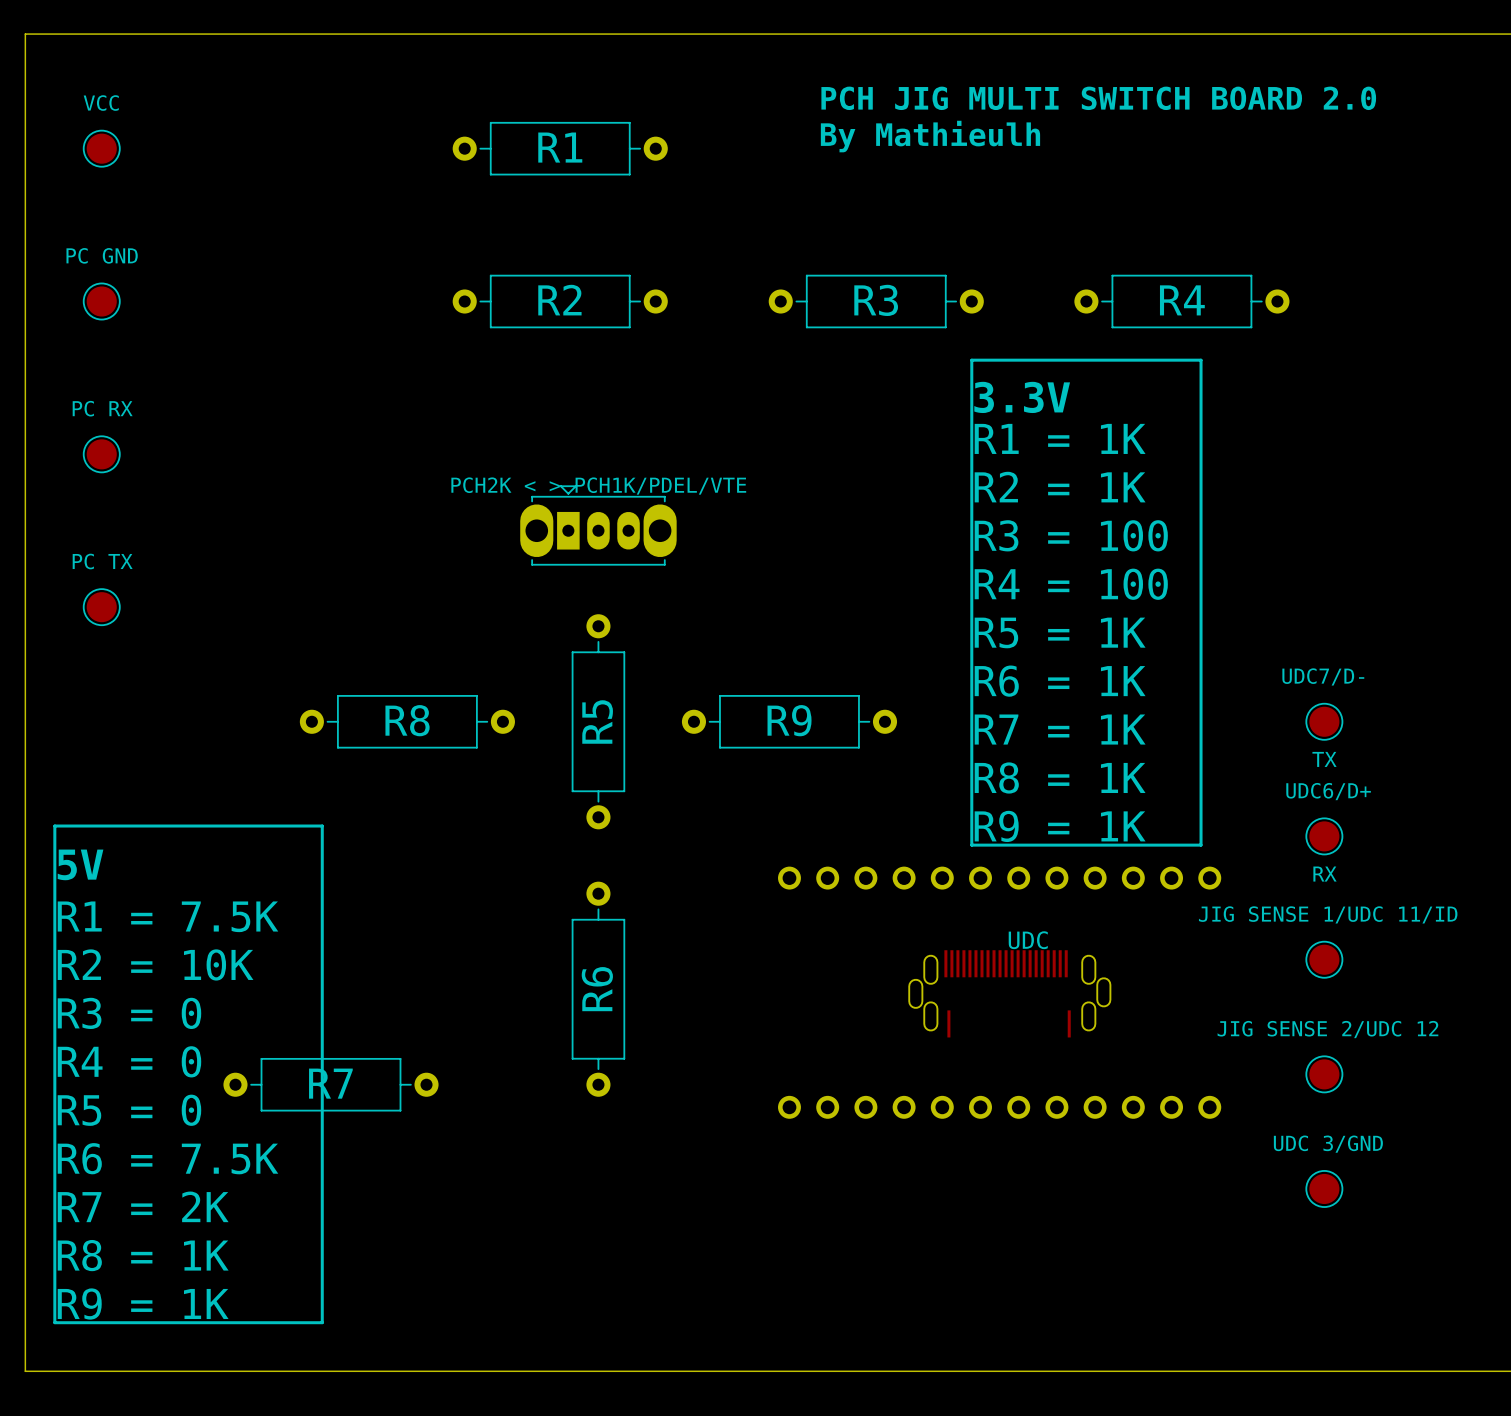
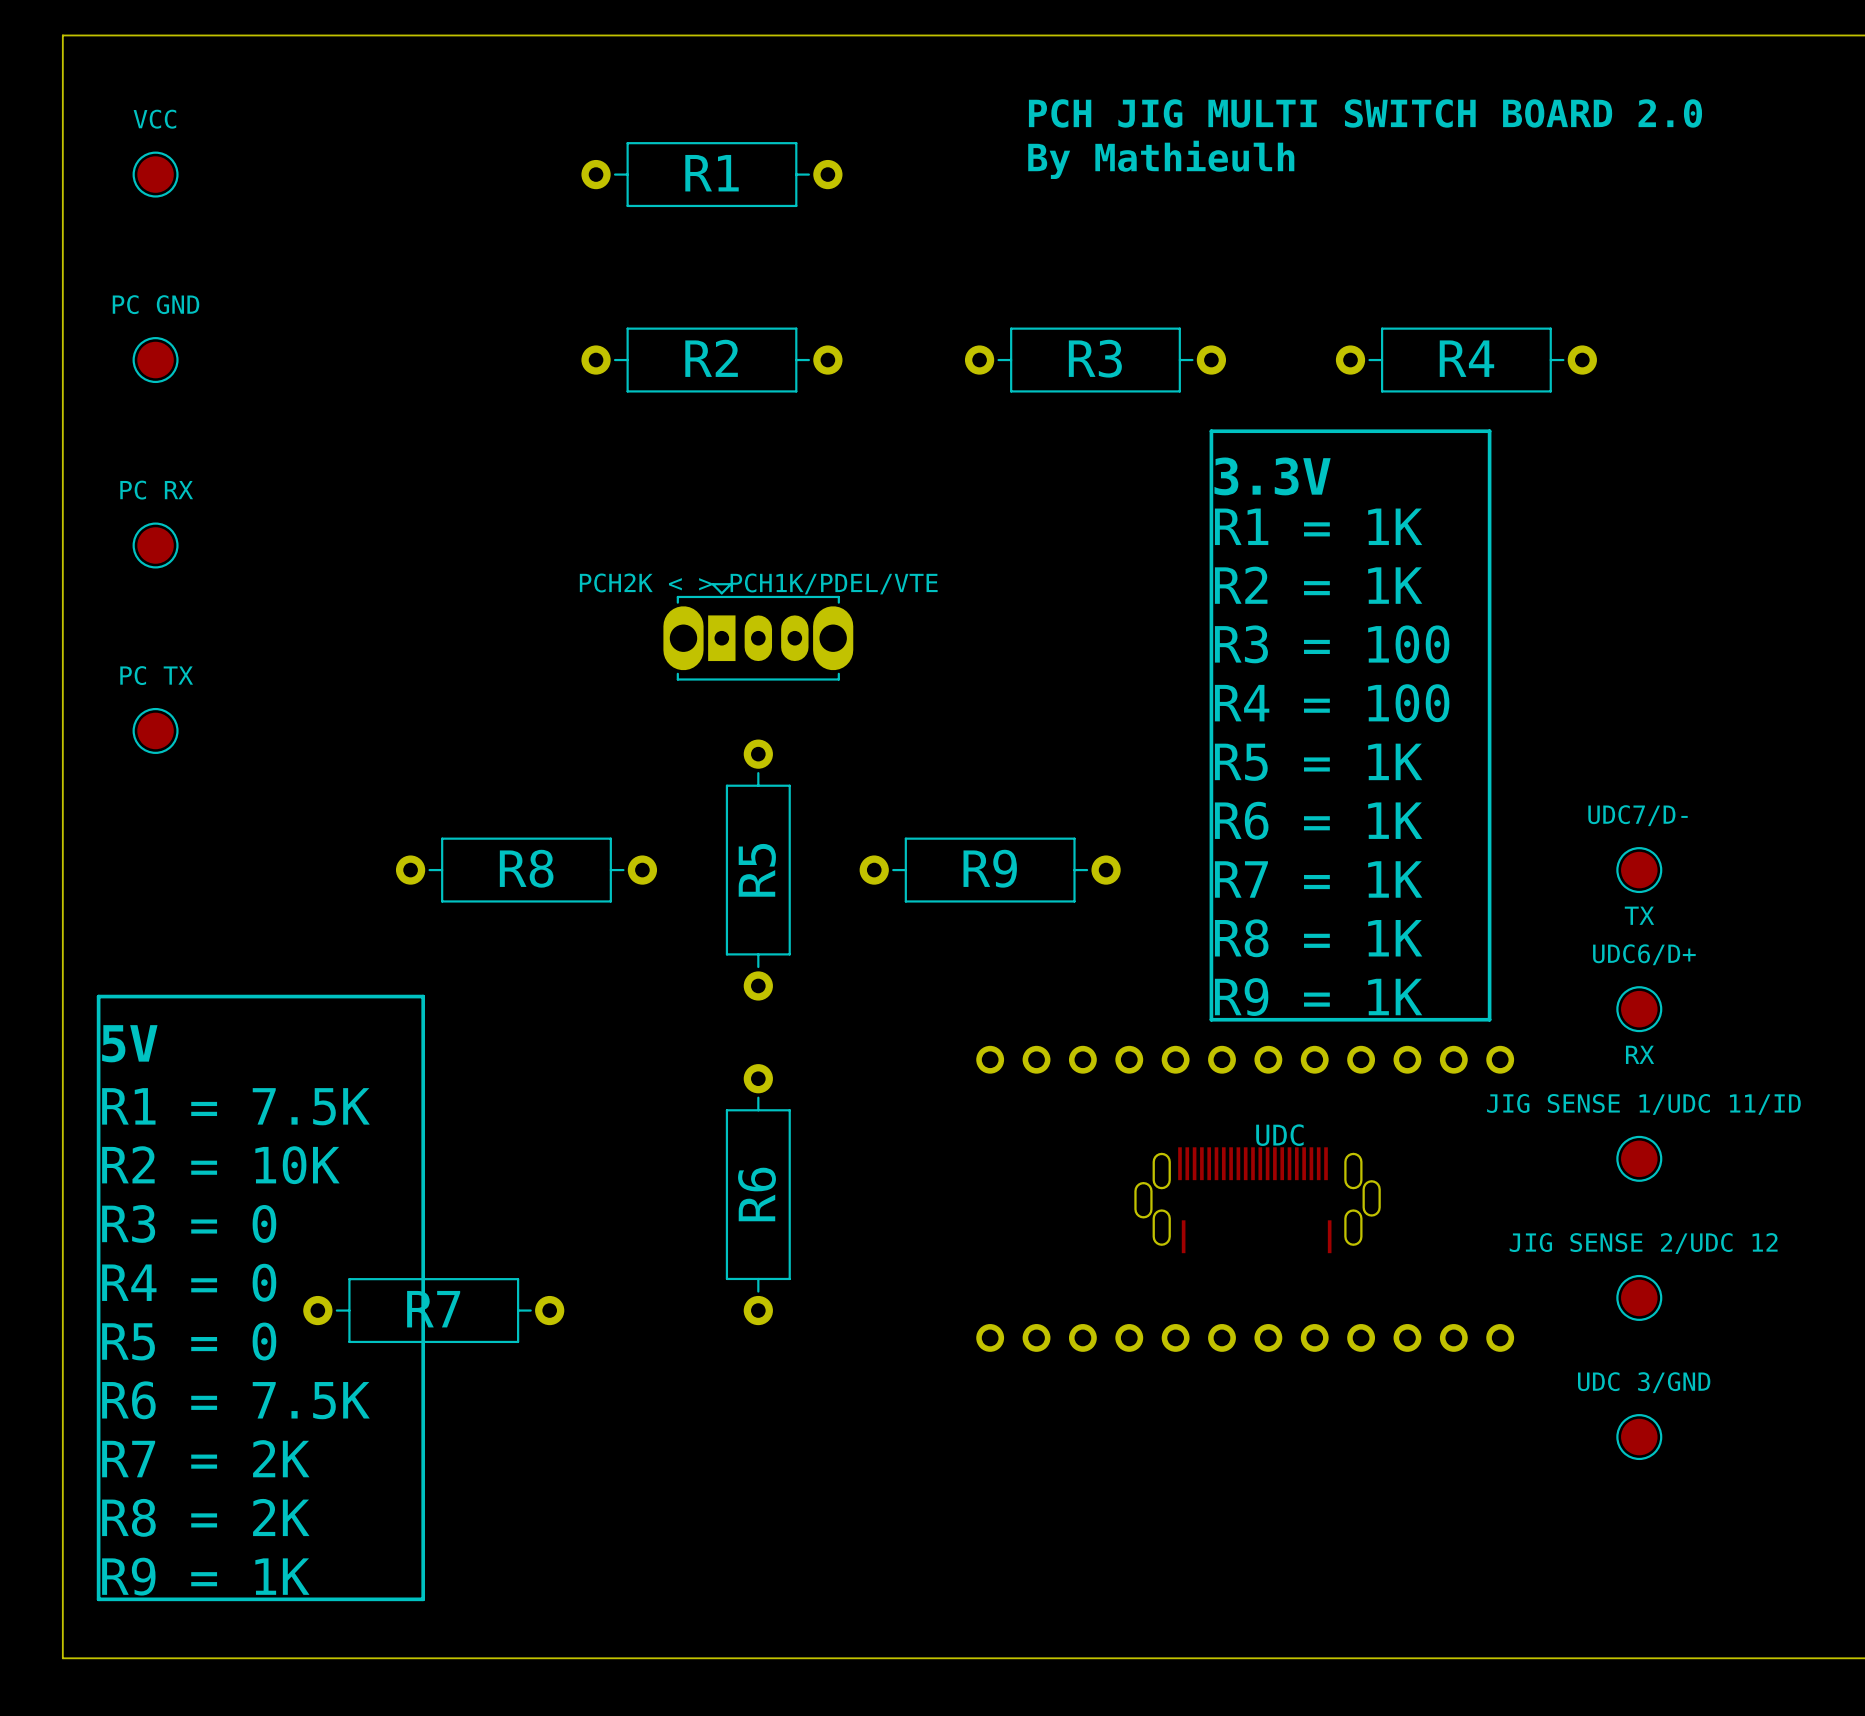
text: R8 = 1K (143, 1255) -> R8 = 2K (205, 1517)

